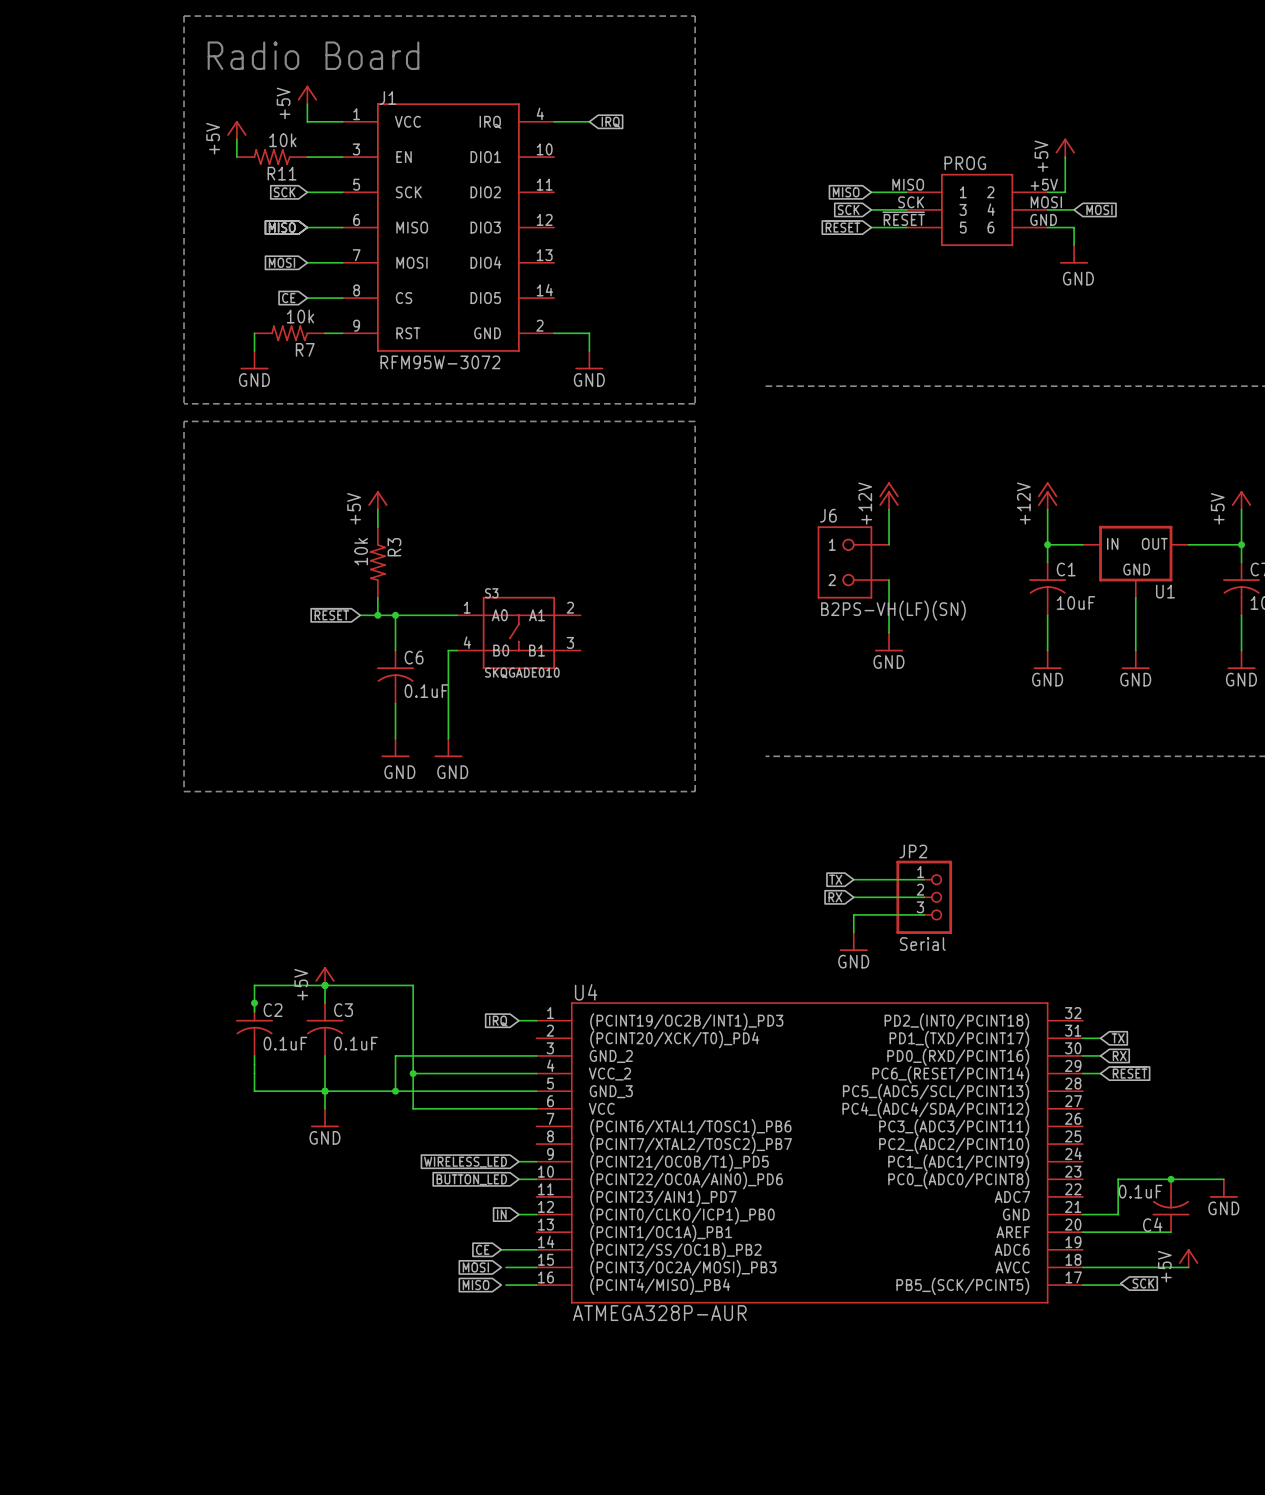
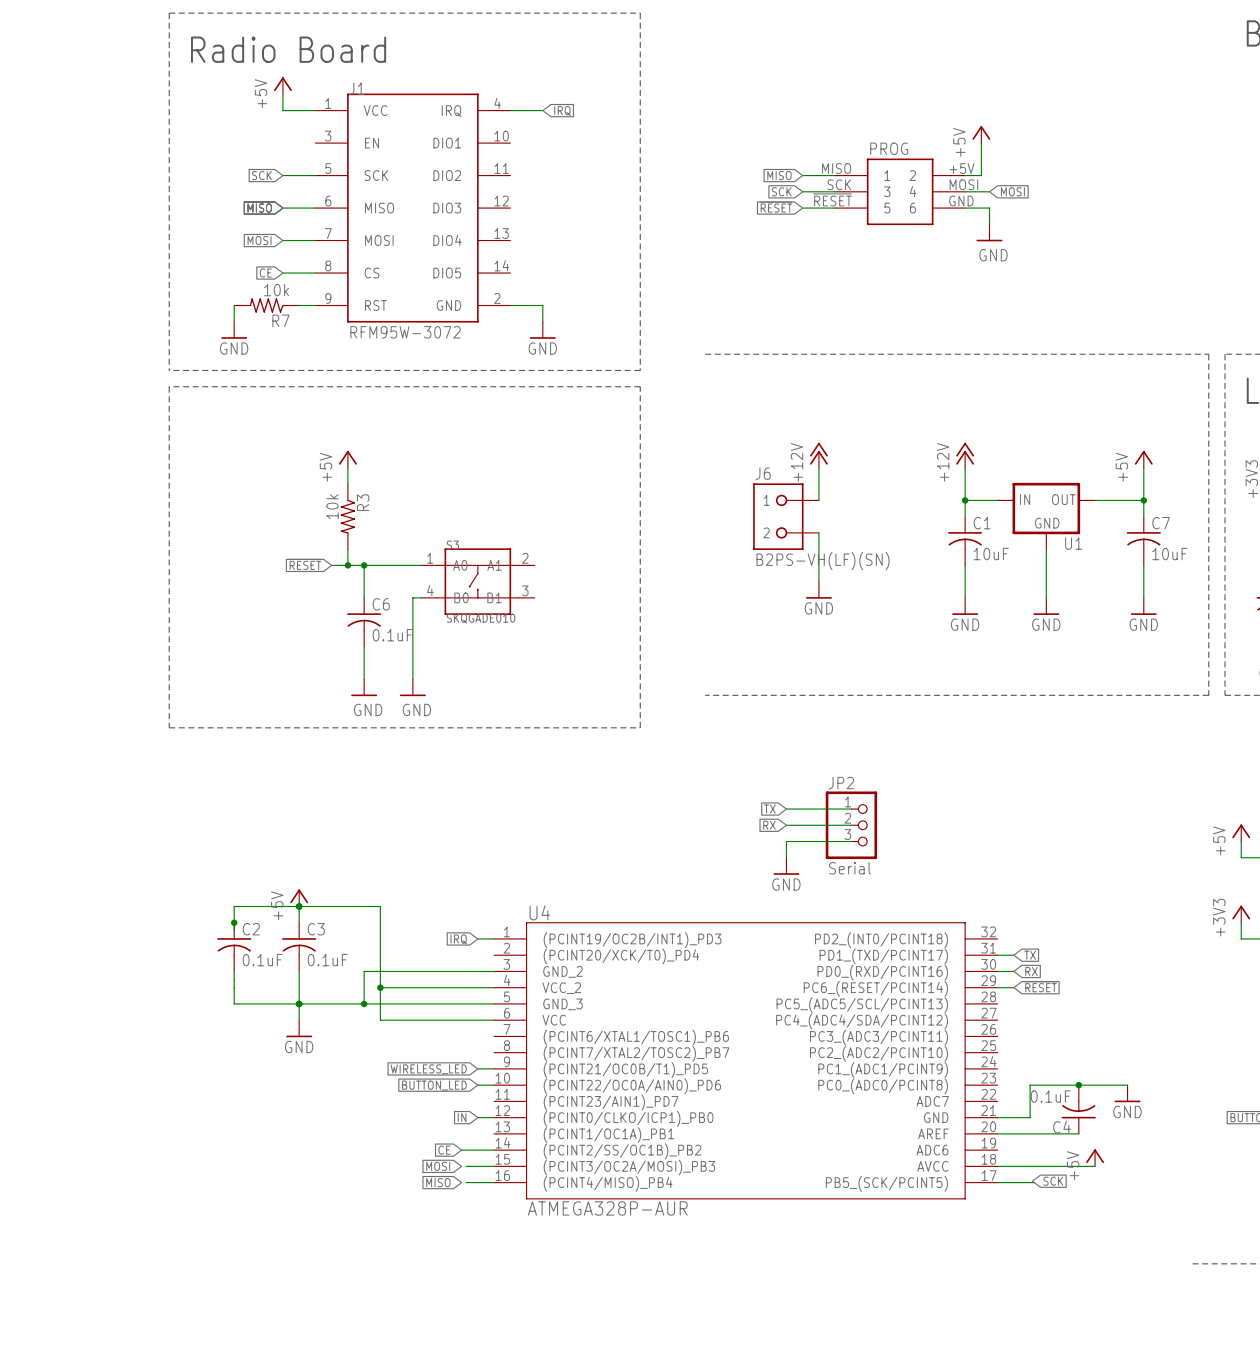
power symbol: +5V (236, 130) -> none
wire: (236, 139) (236, 157) -> none
R11: 10k (272, 157) -> none
wire: (307, 157) (342, 157) -> none

